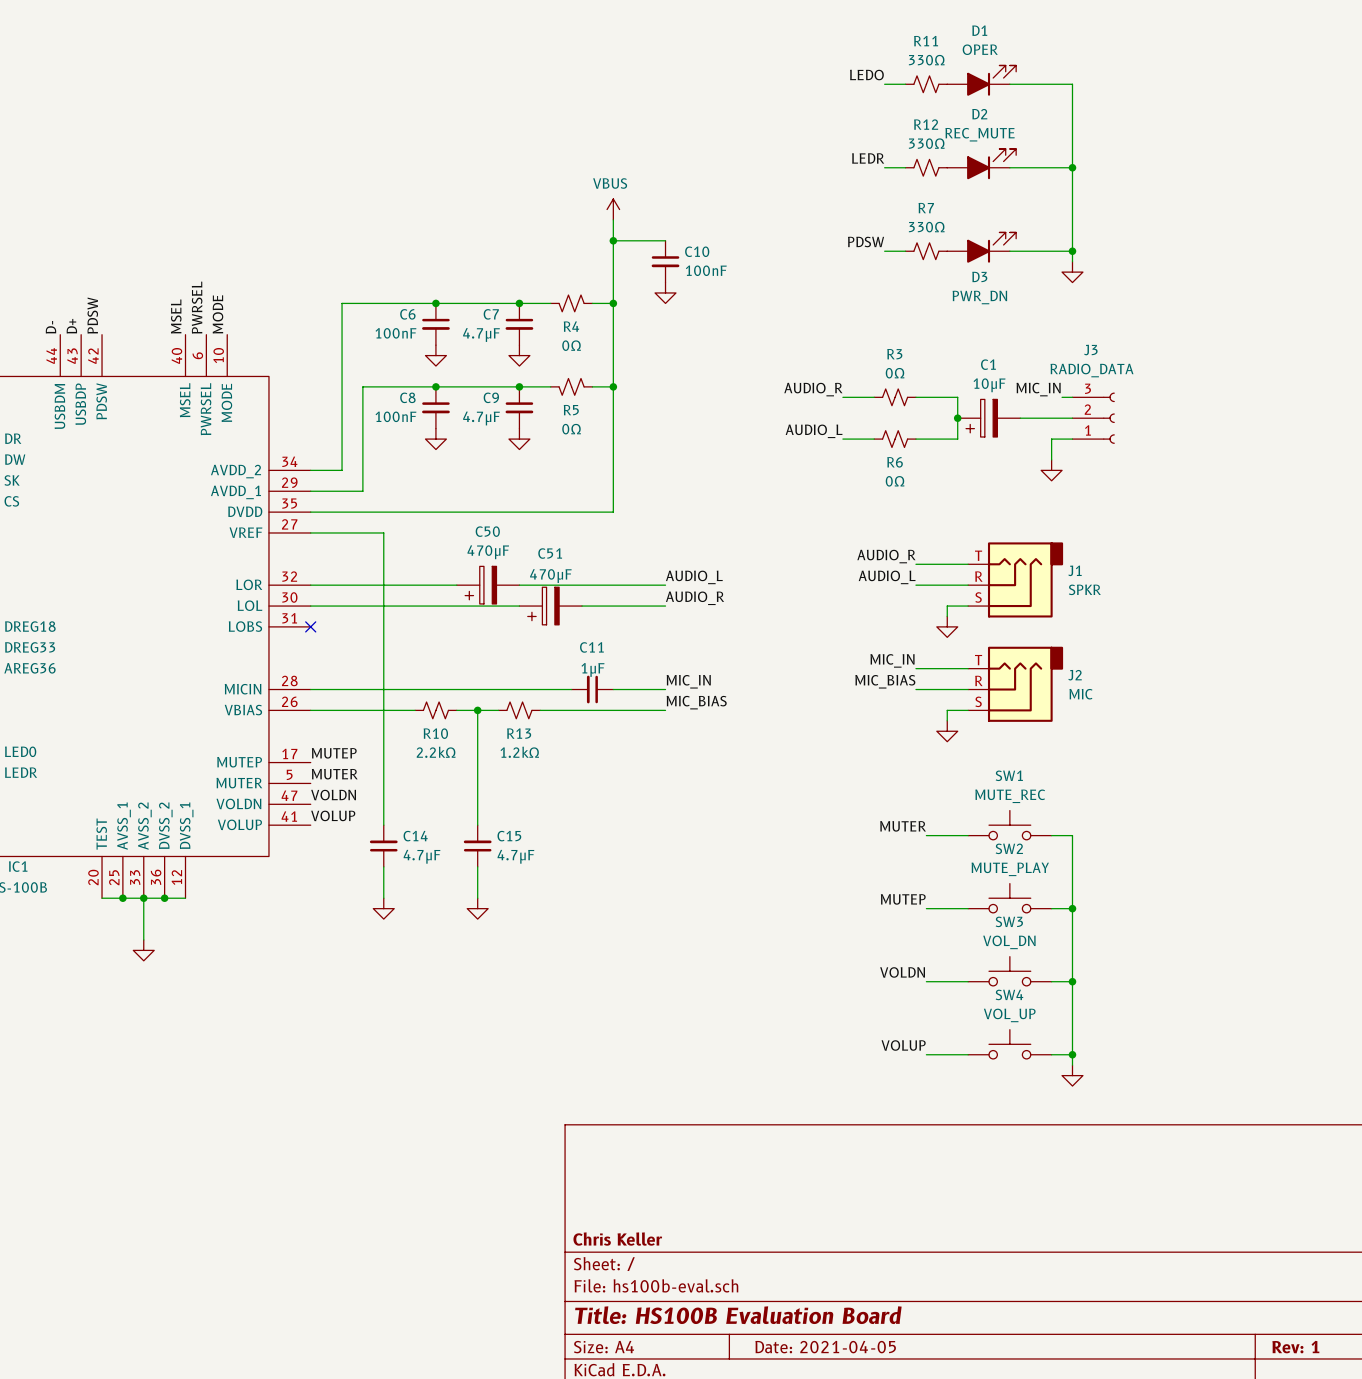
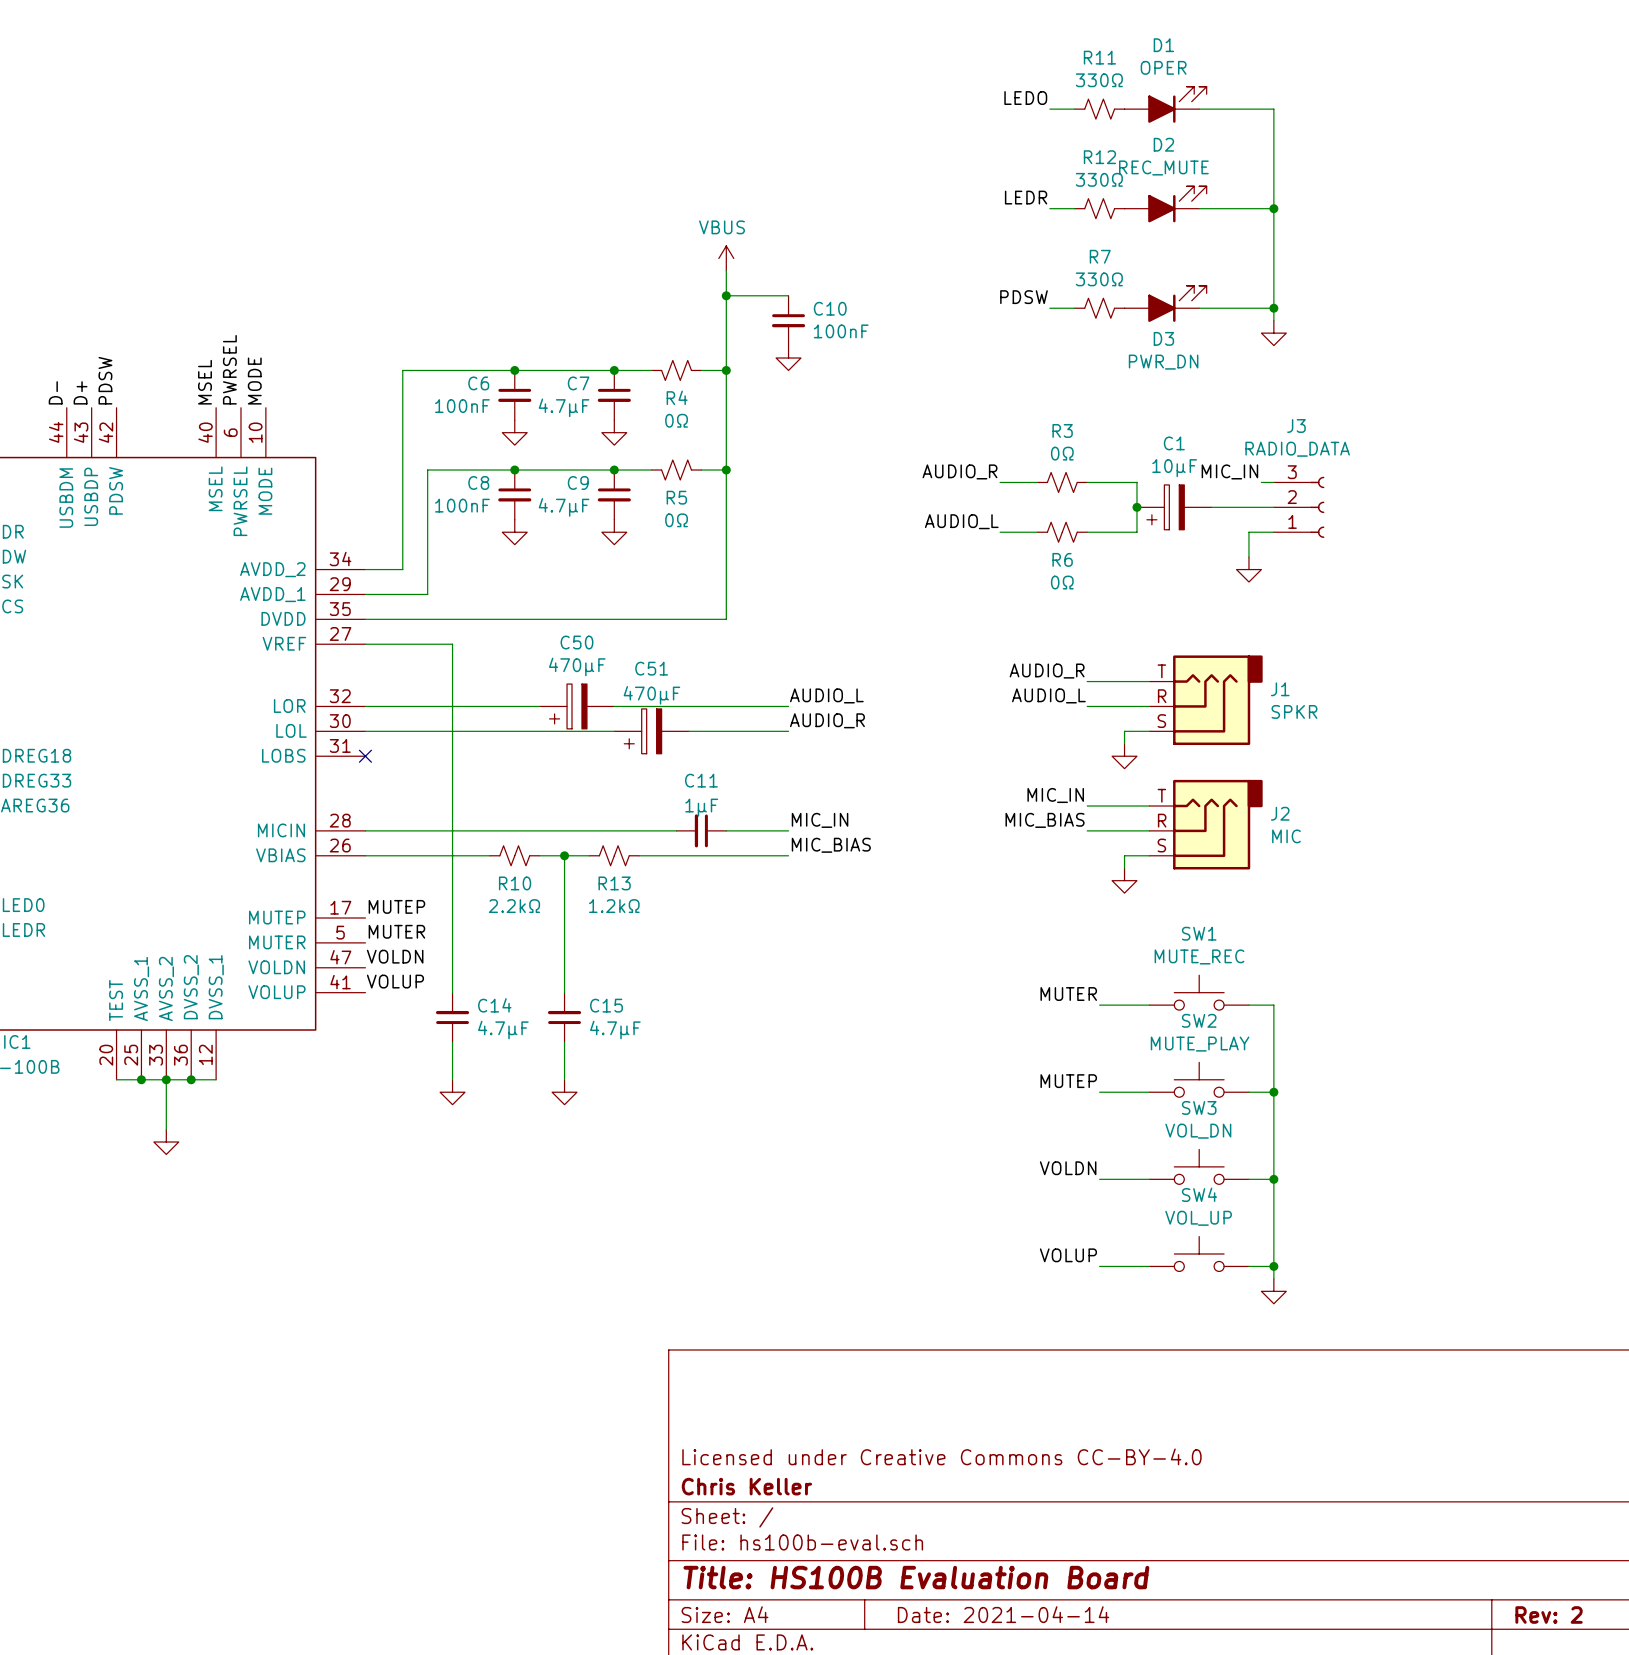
title block: none -> Licensed under Creative Commons CC-BY-4.0 (941, 1456)
title block: Date: 2021-04-05 (825, 1347) -> Date: 2021-04-14 (1003, 1614)
title block: Rev: 1 (1295, 1347) -> Rev: 2 (1549, 1614)

